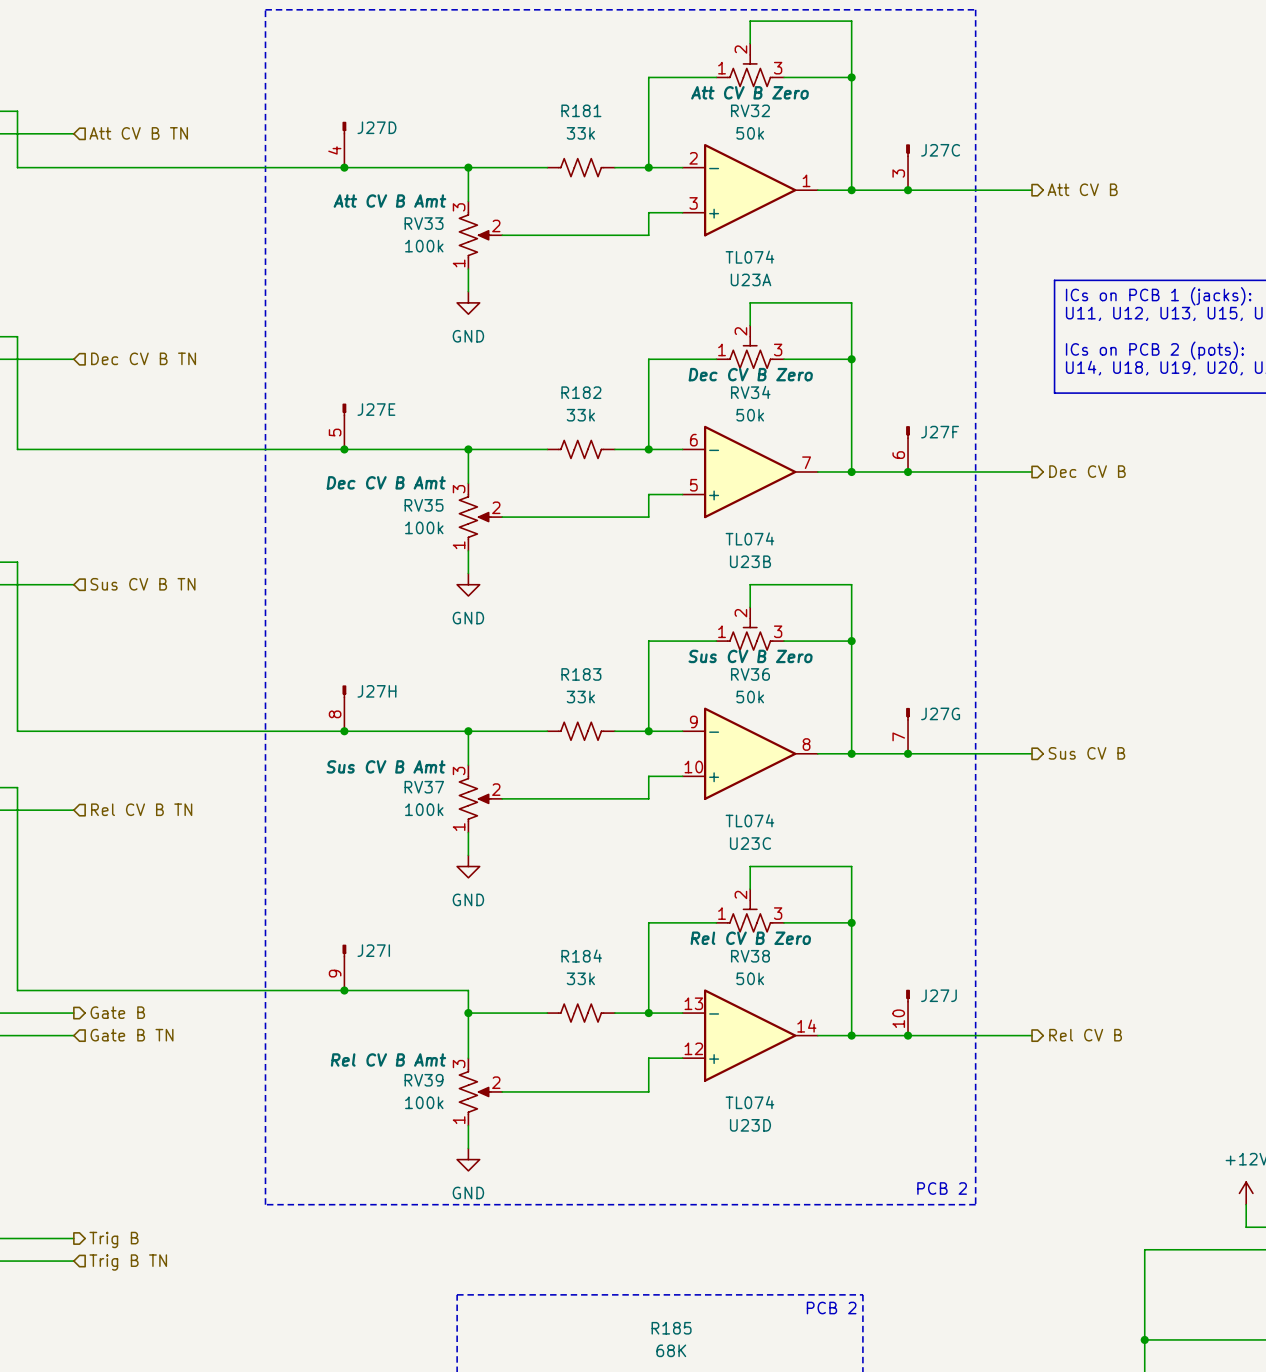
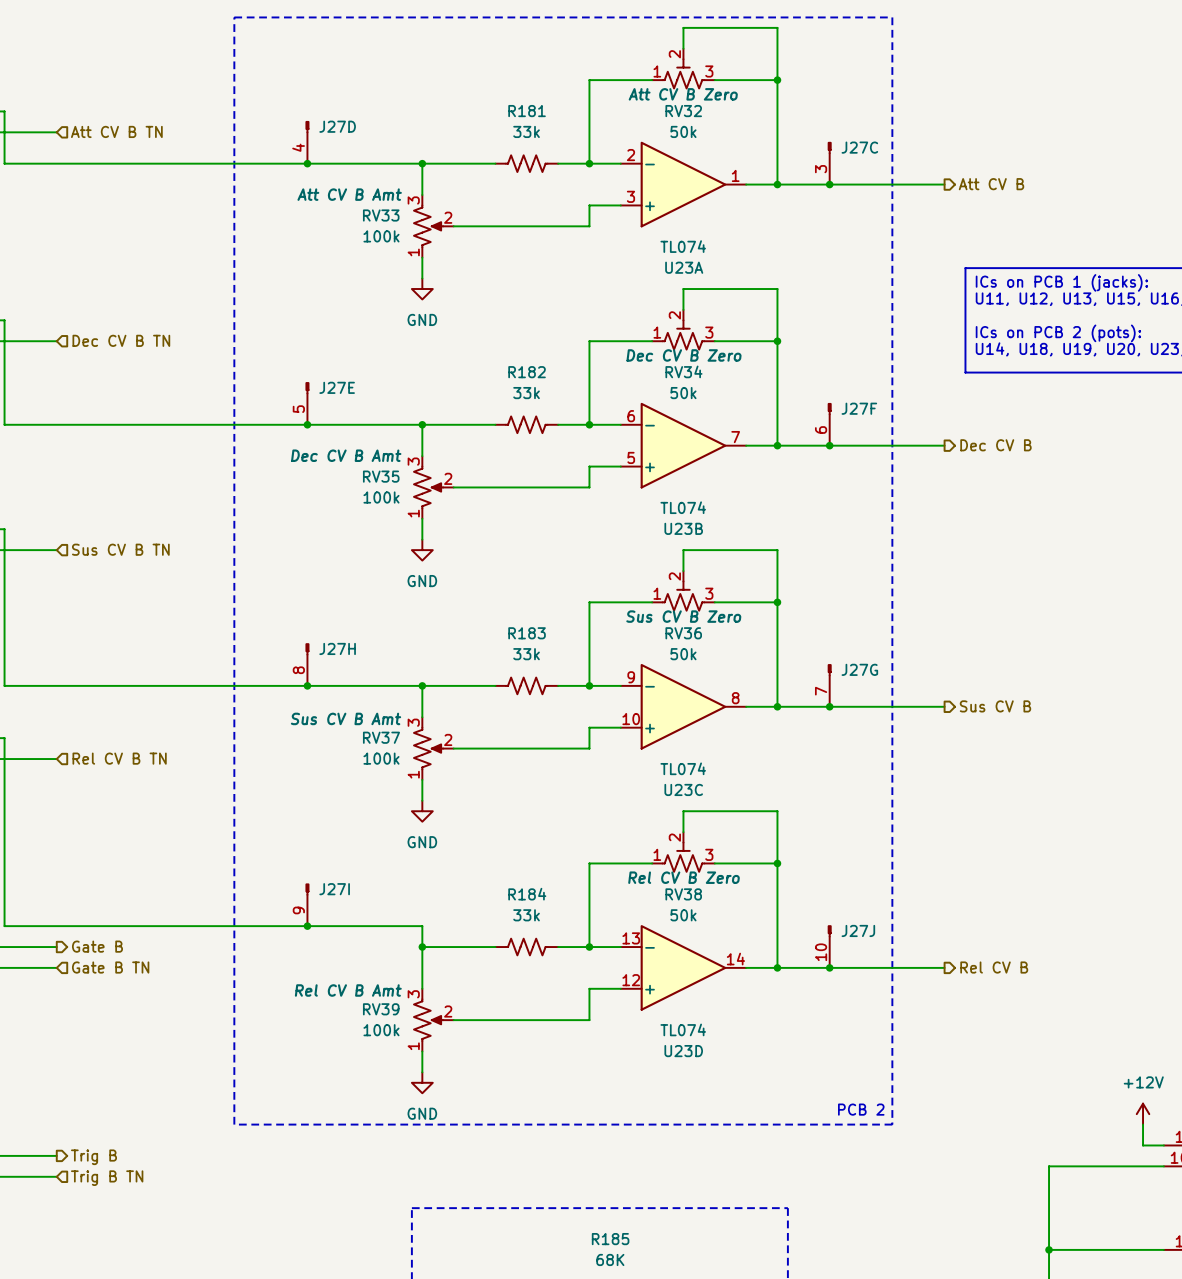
text: PCB 2 (831, 1308) -> none

